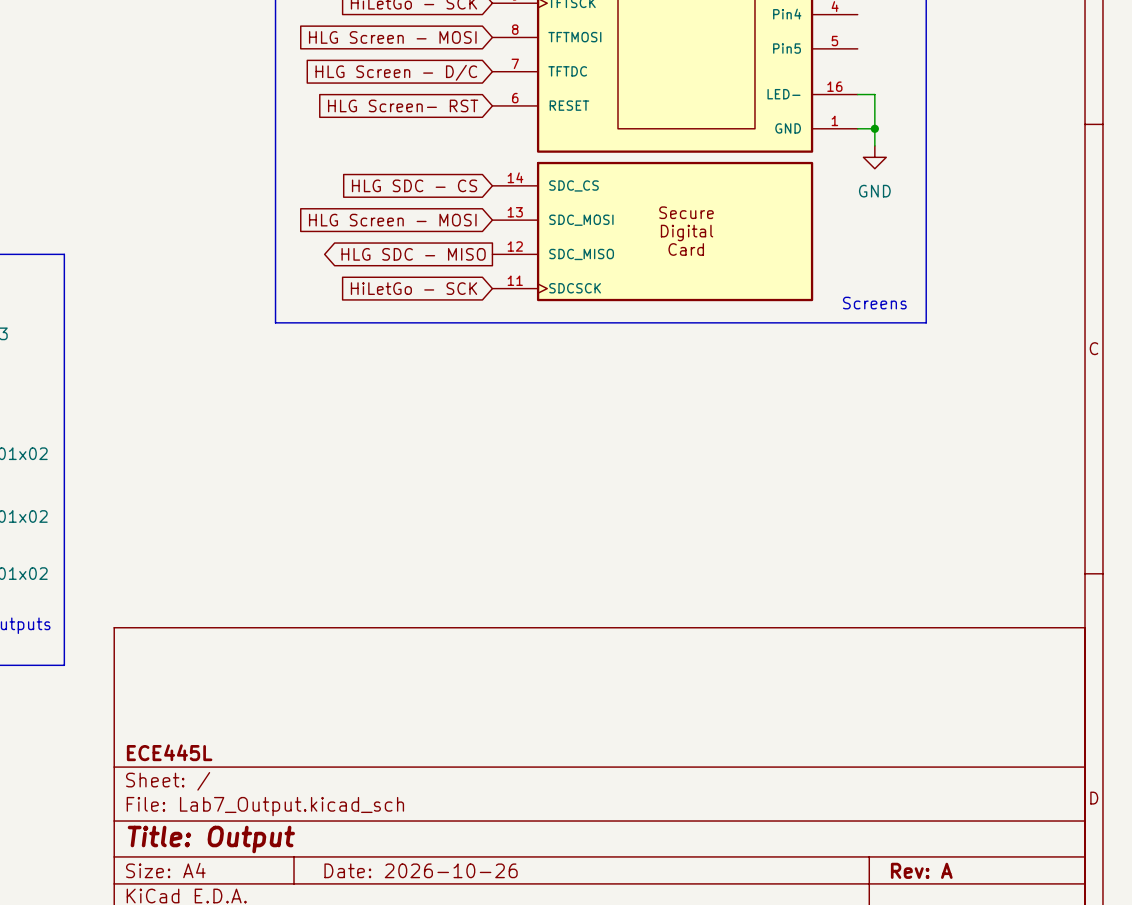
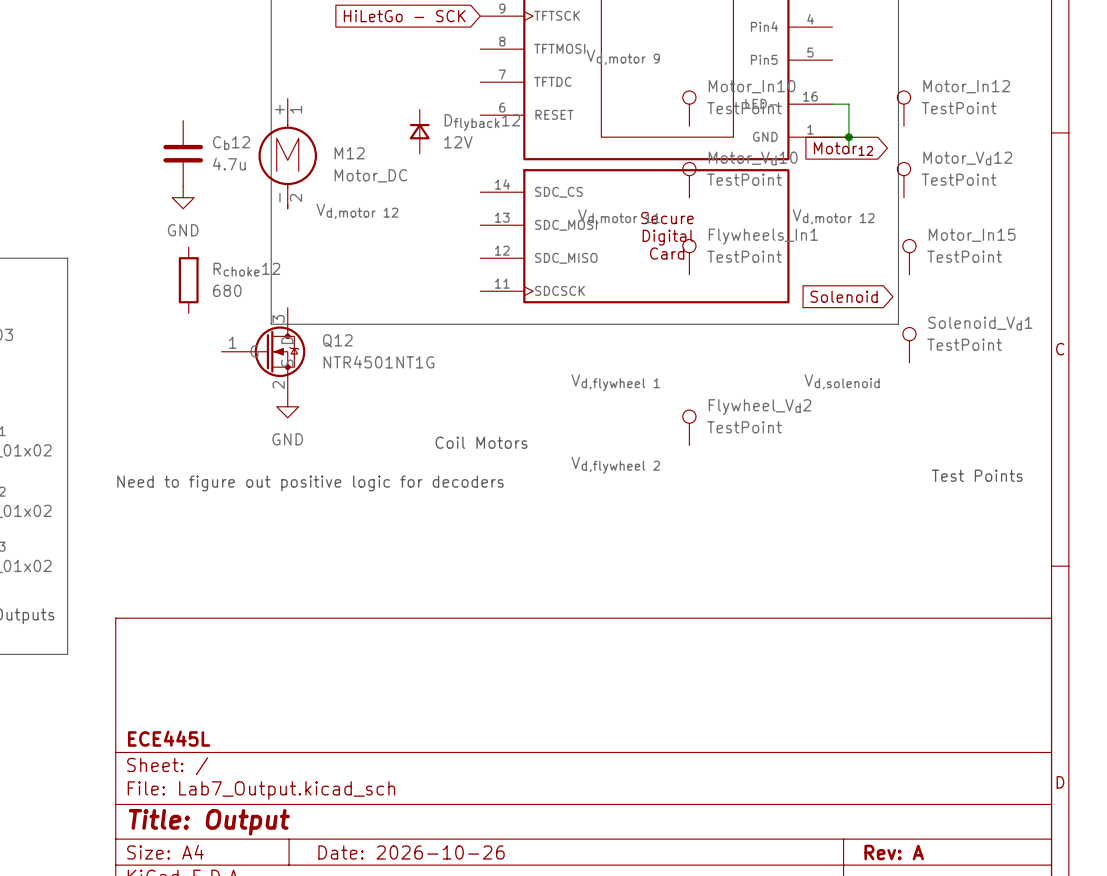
global label: HLG Screen - MOSI (392, 37) -> none
label: none -> Vd,motor 9 (623, 57)
global label: HLG Screen - D/C (396, 72) -> none
Motor_In10: none -> TestPoint (689, 108)
Motor_In12: none -> TestPoint (903, 108)
global label: HLG Screen- RST (403, 105) -> none
Dflyback12: none -> 12V (419, 131)
global label: none -> Motor12 (843, 149)
Cb12: none -> 4.7u (183, 153)
M12: none -> Motor_DC (287, 153)
power symbol: GND (874, 157) -> none
Motor_Vd10: none -> TestPoint (689, 180)
Motor_Vd12: none -> TestPoint (903, 180)
global label: HLG SDC - CS (414, 185) -> none
power symbol: none -> GND (183, 197)
label: none -> Vd,motor 12 (357, 211)
label: none -> Vd,motor 11 (619, 216)
label: none -> Vd,motor 12 (833, 216)
global label: HLG Screen - MOSI (392, 220) -> none
Flywheels_In1: none -> TestPoint (689, 257)
Motor_In15: none -> TestPoint (909, 257)
global label: HLG SDC - MISO (413, 254) -> none
Rchoke12: none -> 680 (188, 280)
global label: HiLetGo - SCK (413, 288) -> none
global label: none -> Solenoid (844, 296)
text: Screens (874, 303) -> none
Solenoid_Vd1: none -> TestPoint (909, 345)
Q12: none -> NTR4501NT1G (263, 351)
label: none -> Vd,solenoid (842, 381)
label: none -> Vd,flywheel 1 (615, 382)
power symbol: none -> GND (287, 406)
Flywheel_Vd2: none -> TestPoint (689, 427)
text: none -> Coil Motors (481, 442)
label: none -> Vd,flywheel 2 (615, 465)
text: none -> Test Points (977, 475)
text: none -> Need to figure out positive logic for decoders (310, 483)

